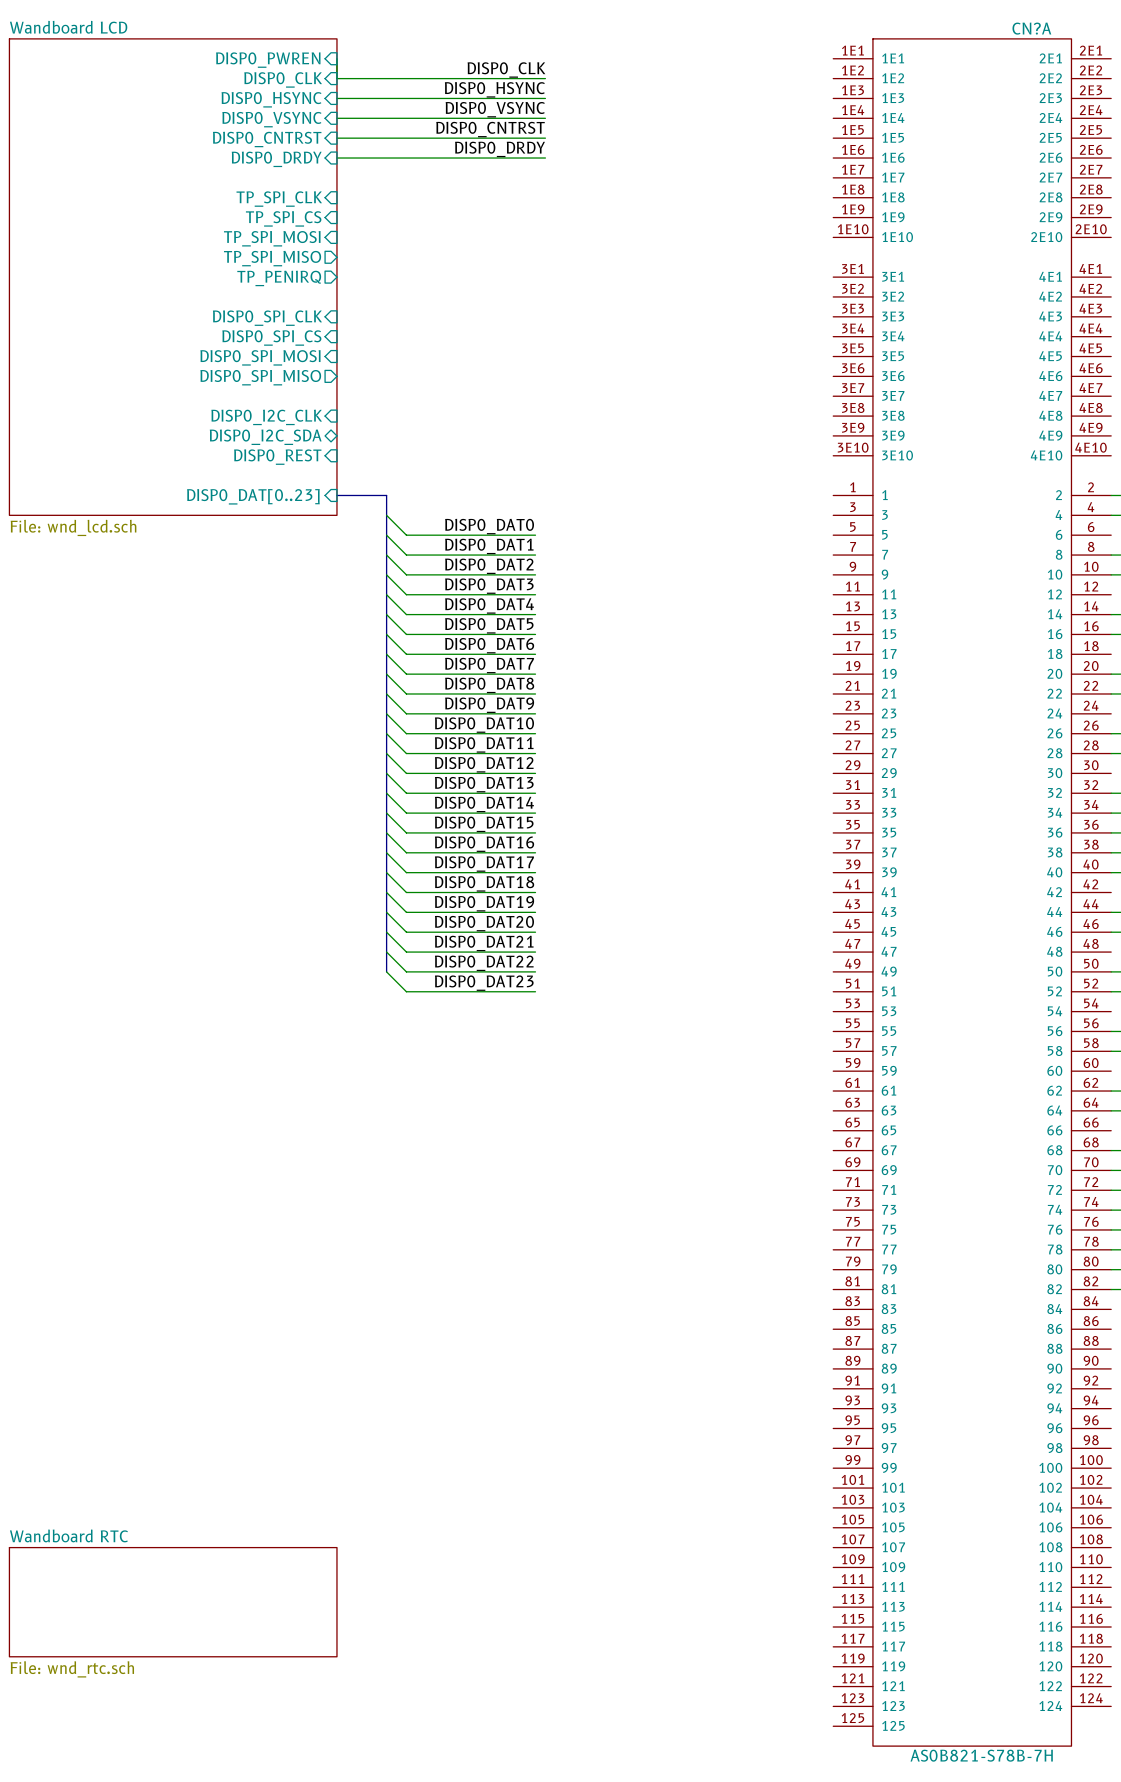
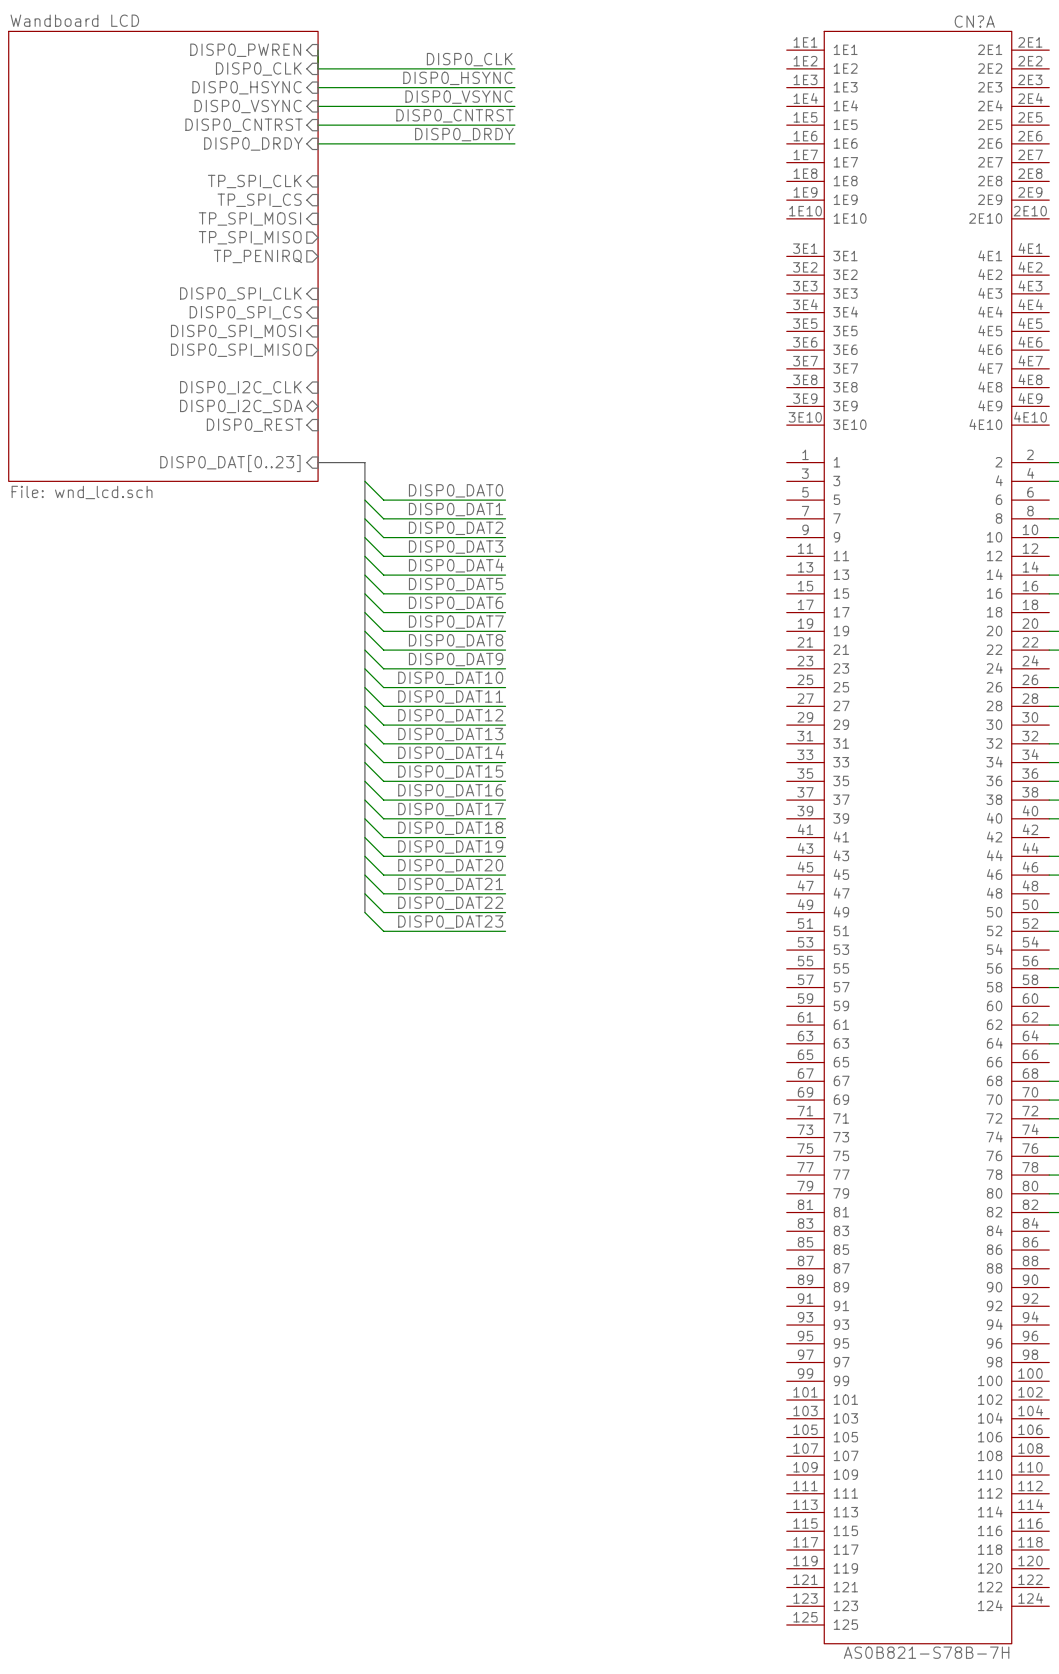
sheet Wandboard RTC: File: wnd_rtc.sch (173, 1602) -> none

